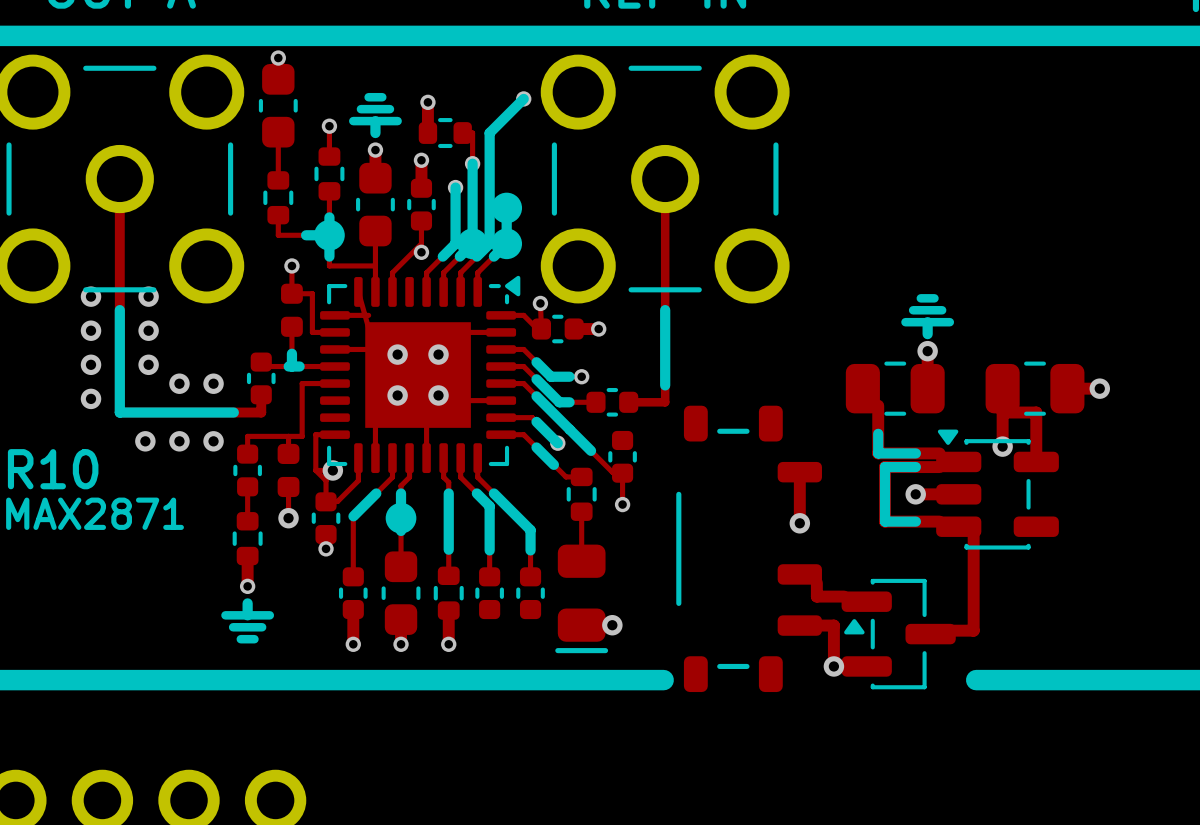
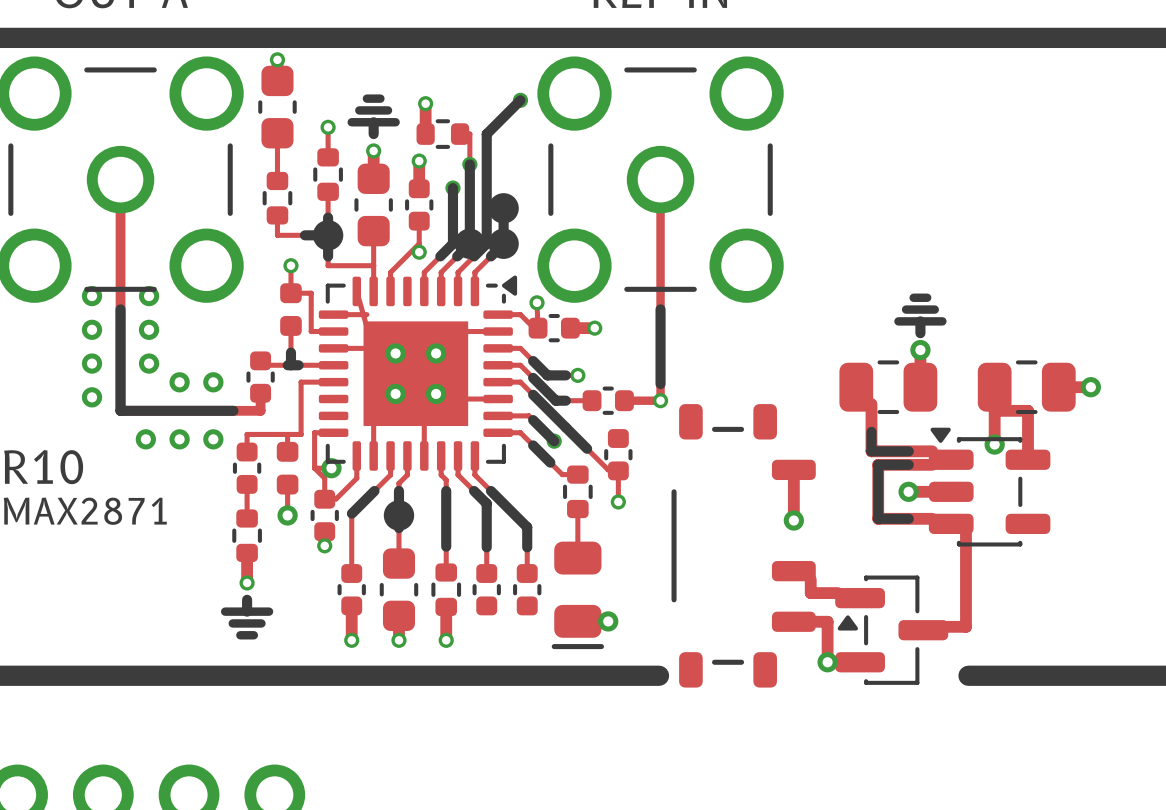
via: none -> (660, 400)

